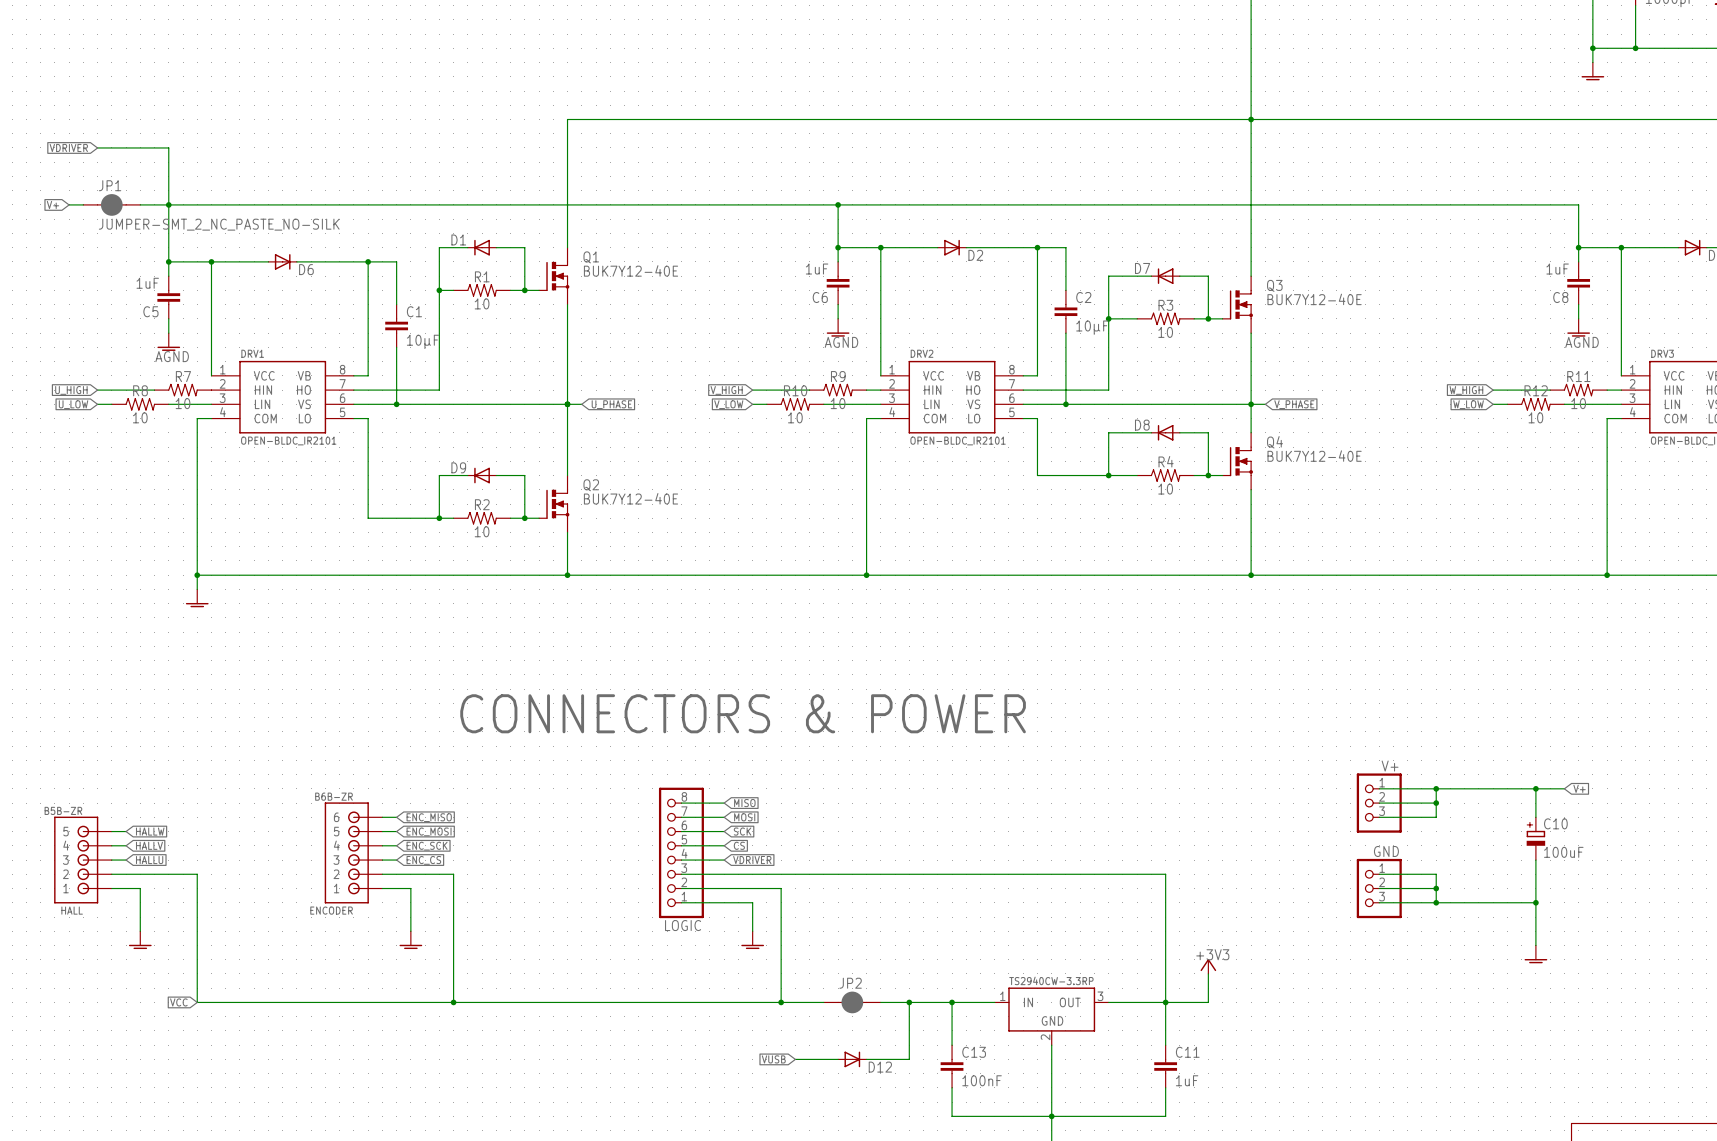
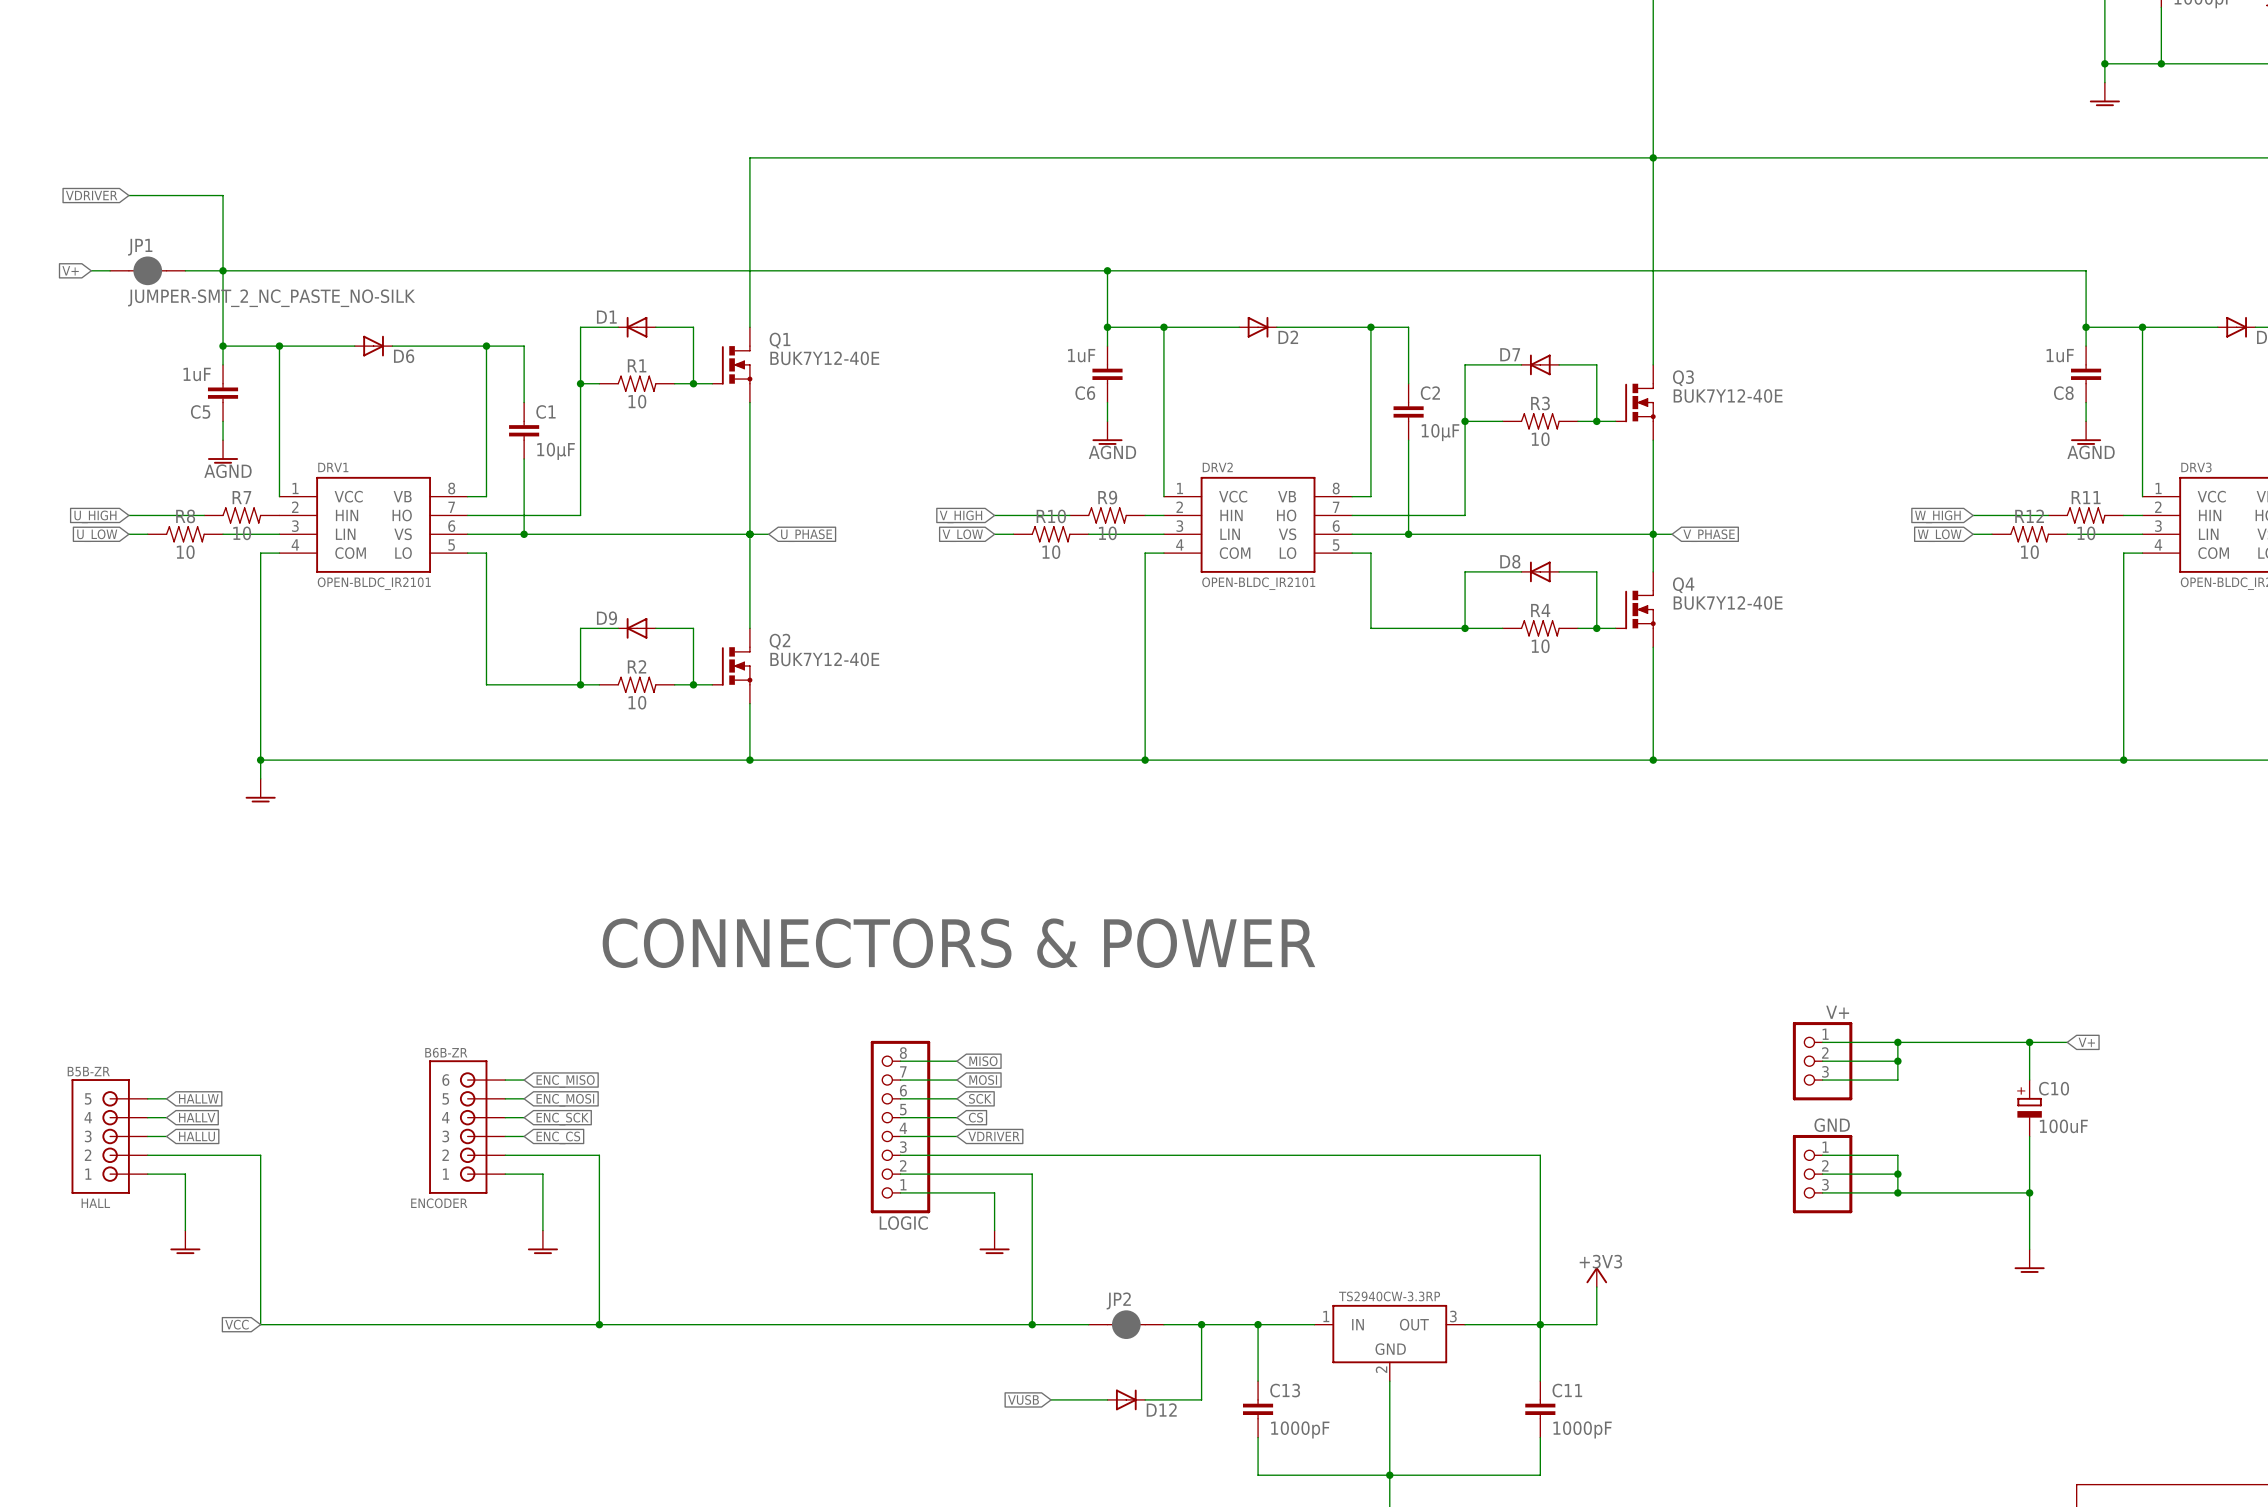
C13 value: 100nF (982, 1080) -> 1000pF (1300, 1429)
C11 value: 1uF (1187, 1080) -> 1000pF (1582, 1429)

